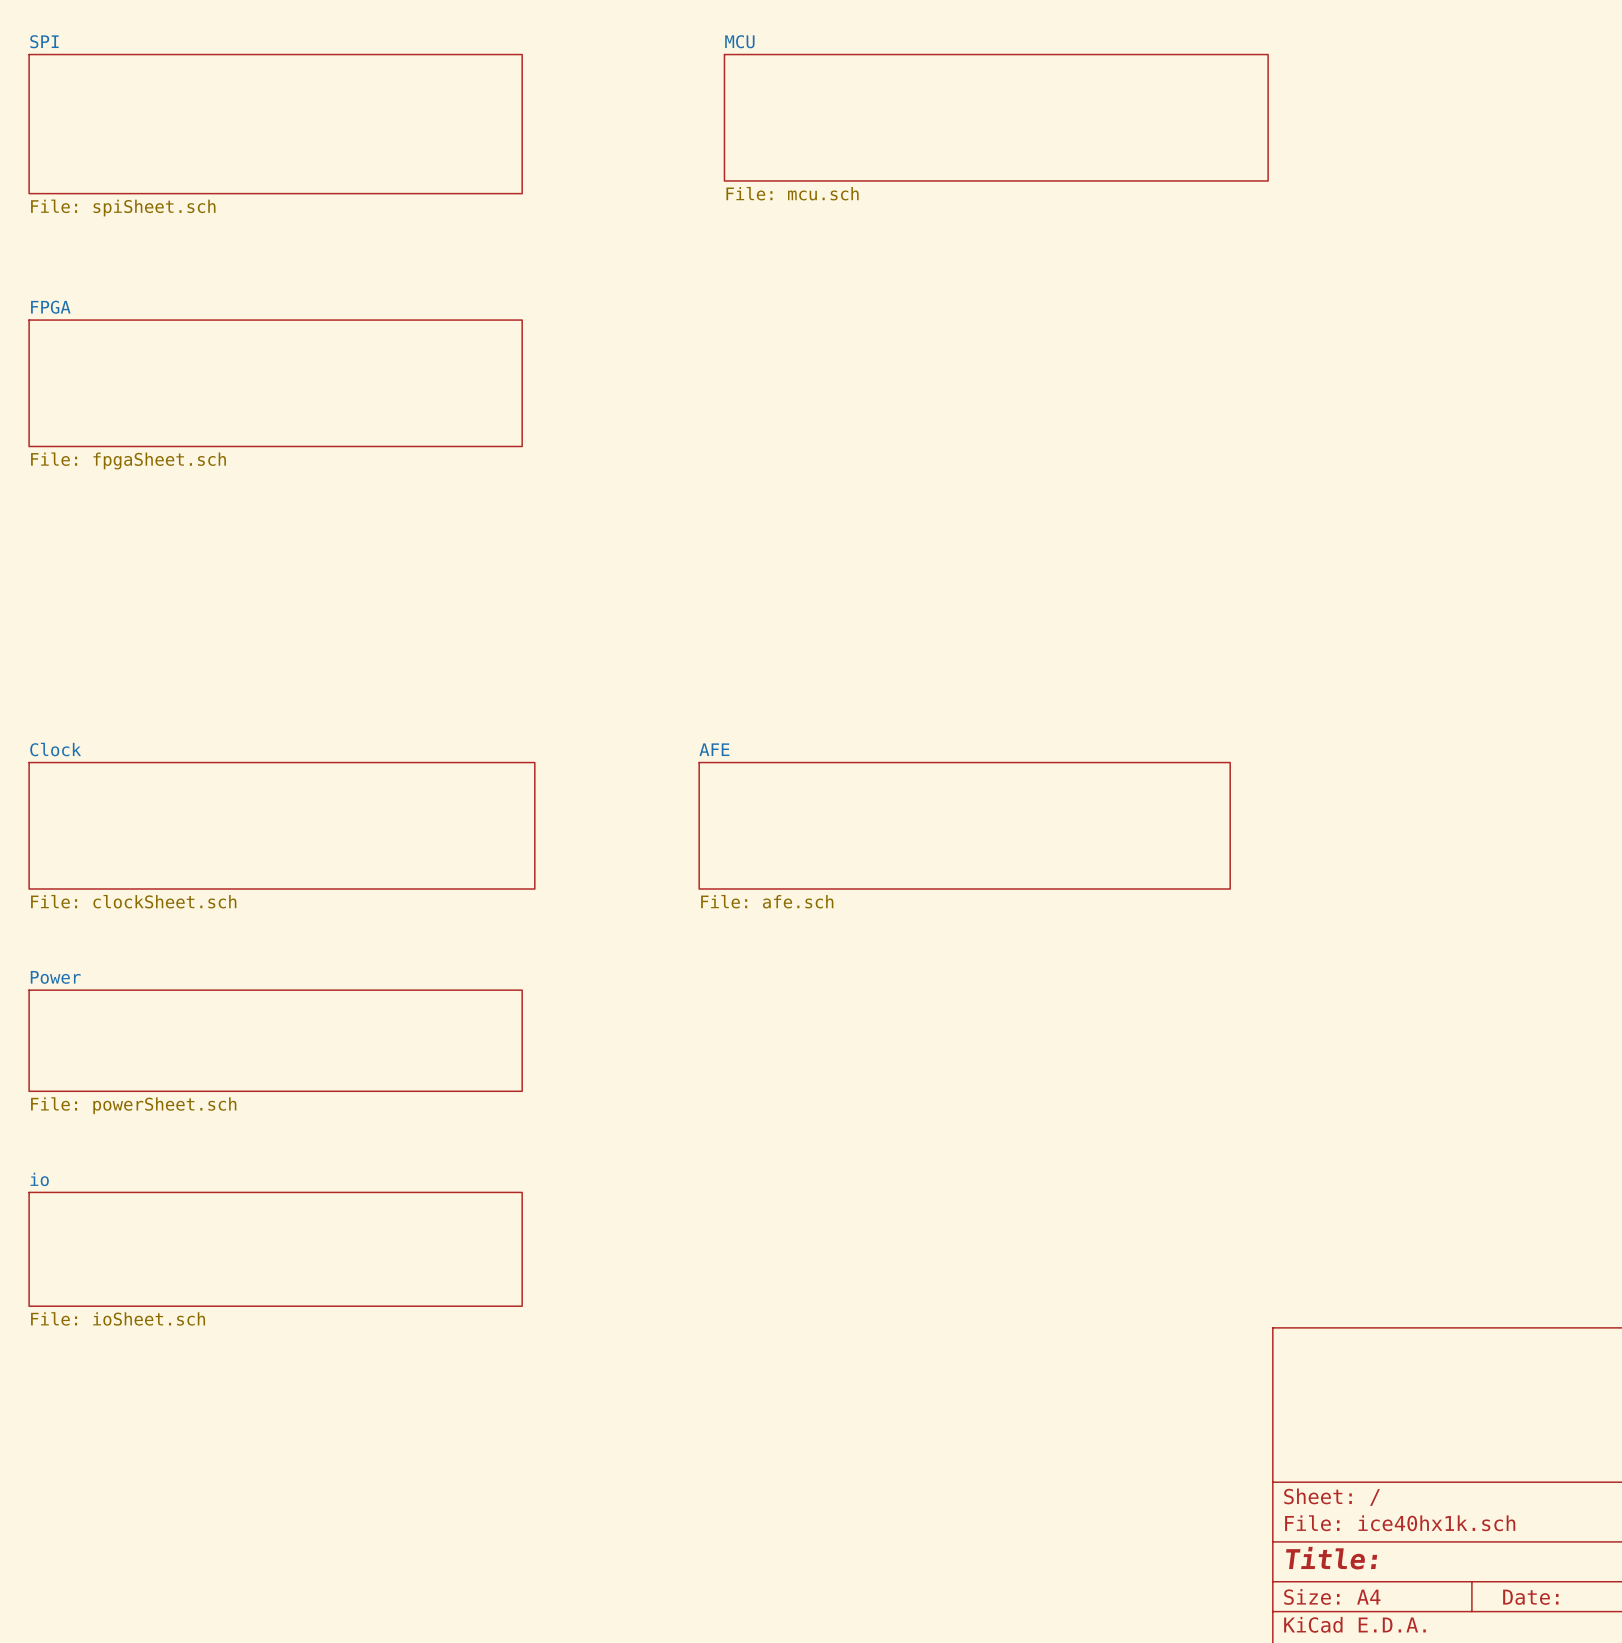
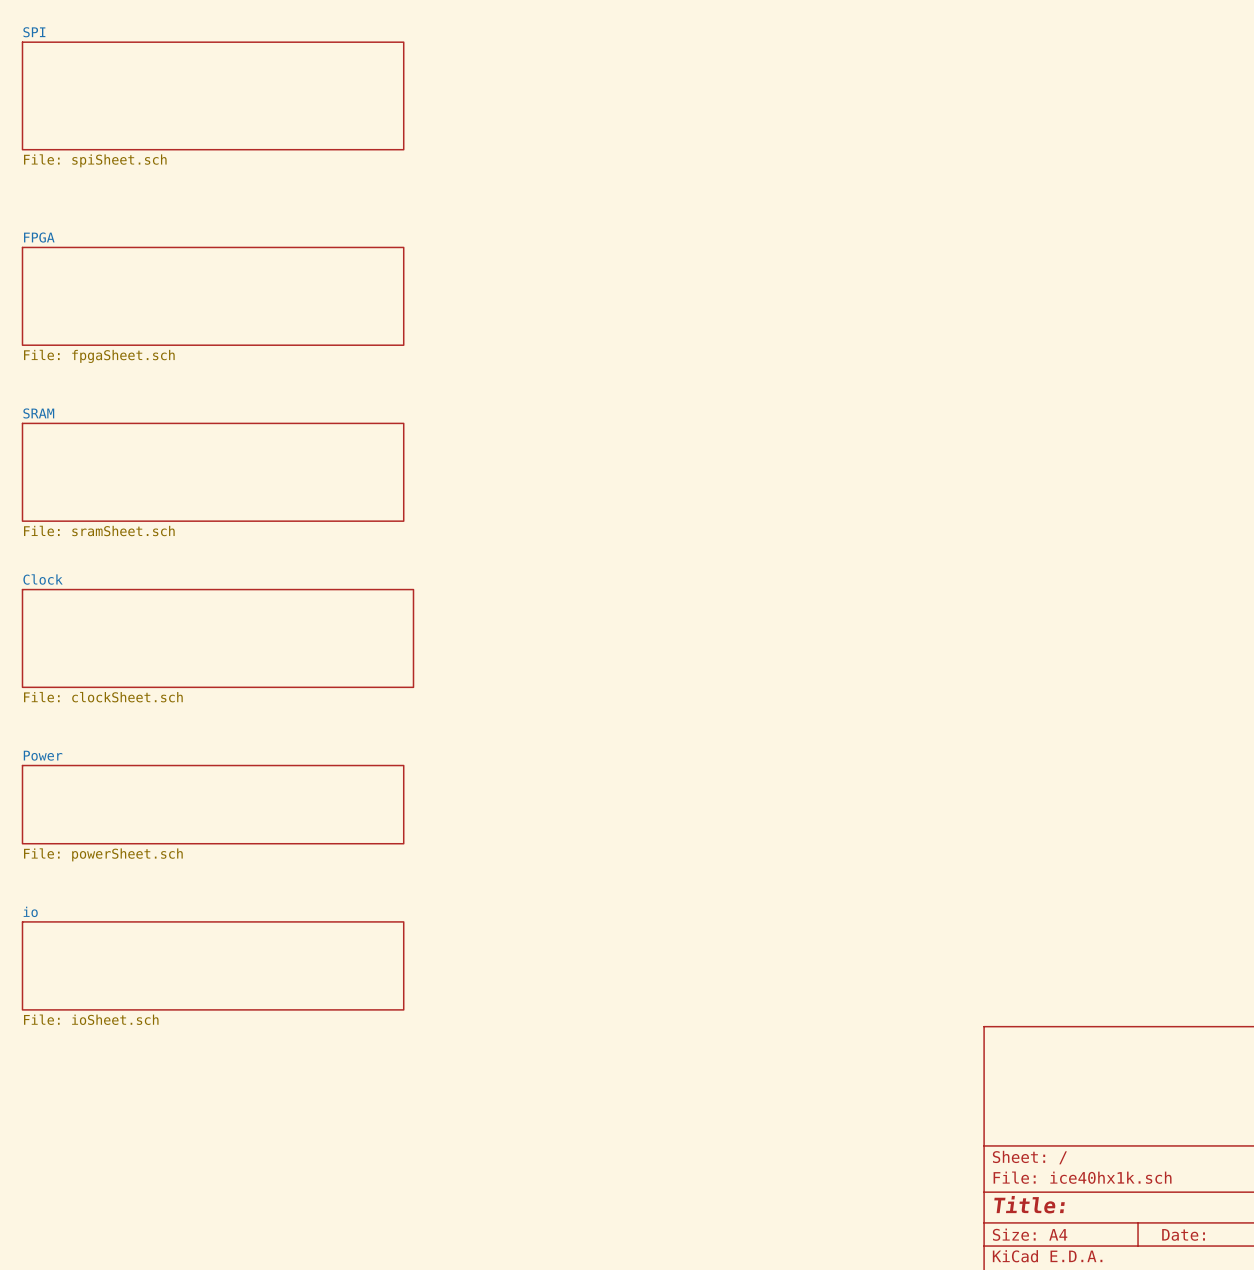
sheet MCU: File: mcu.sch (996, 117) -> none
sheet SRAM: none -> File: sramSheet.sch (213, 472)
sheet AFE: File: afe.sch (964, 825) -> none

